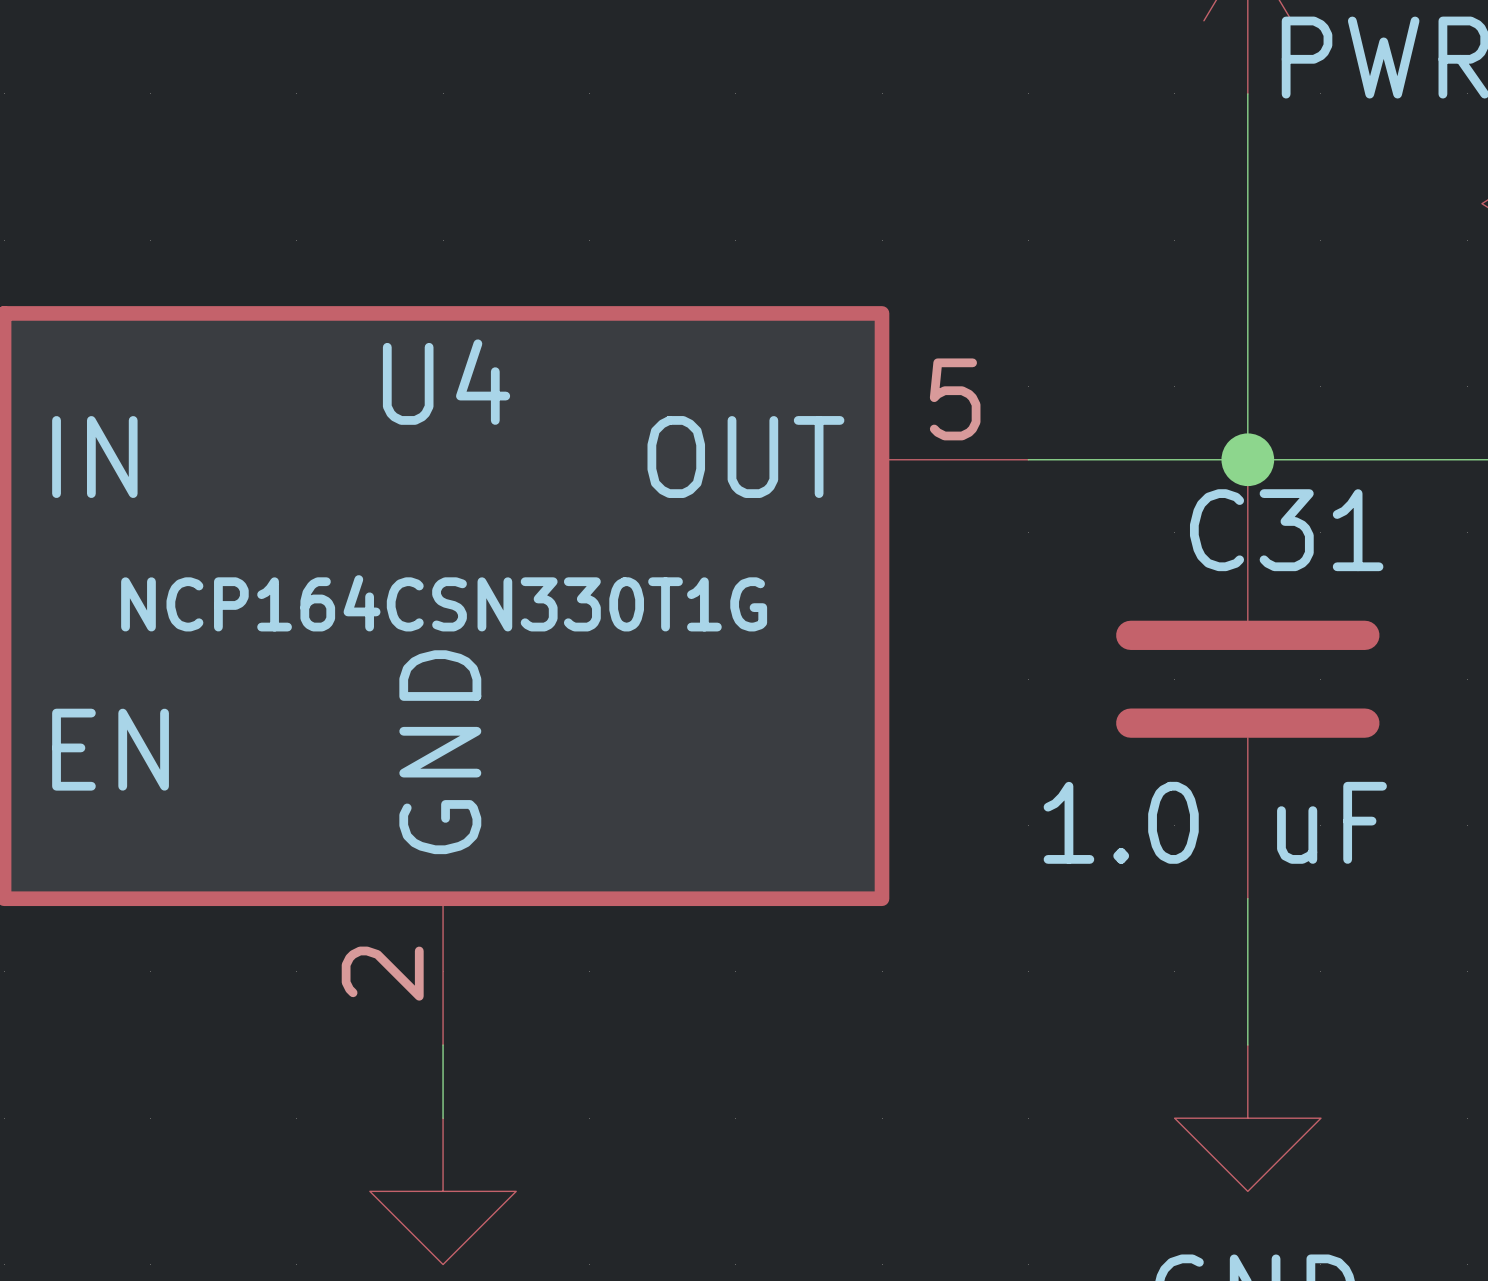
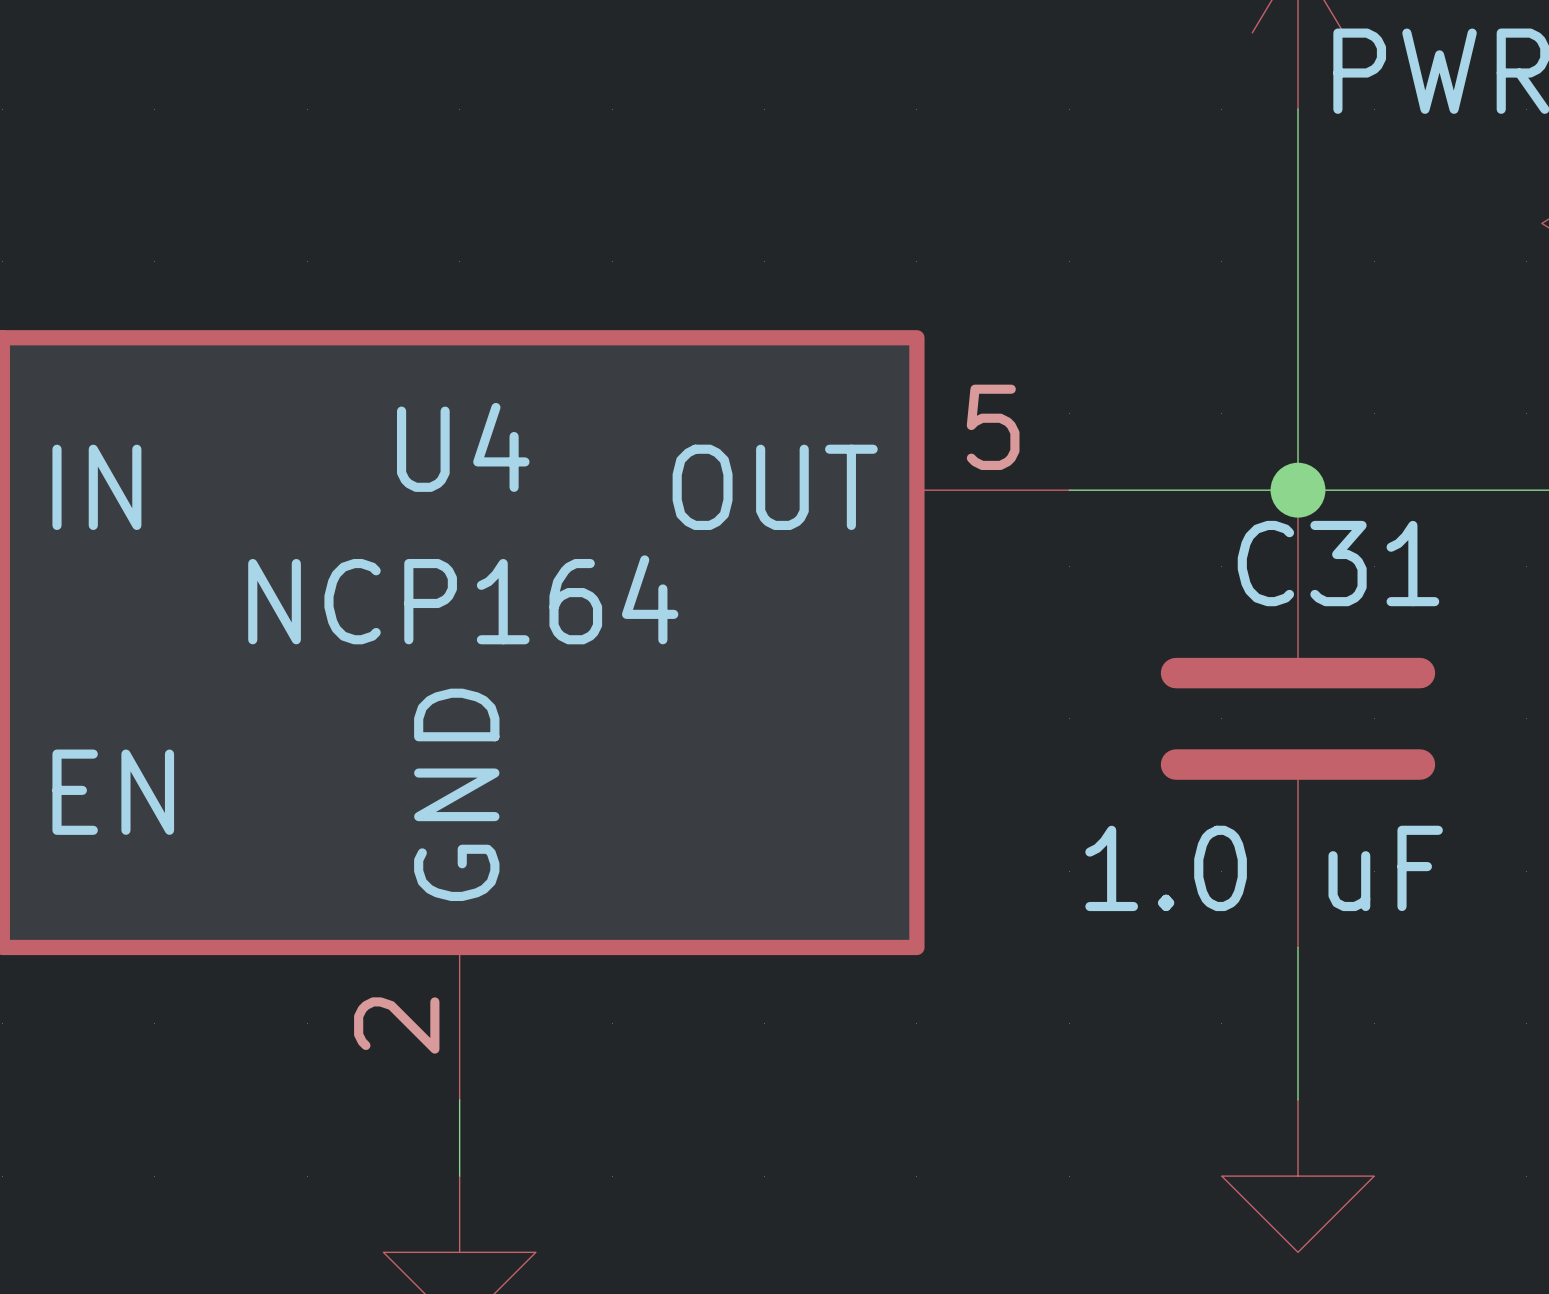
U4 name position: U4 (446, 382) -> U4 (463, 447)
U4 value: NCP164CSN330T1G (444, 603) -> NCP164 (463, 599)

